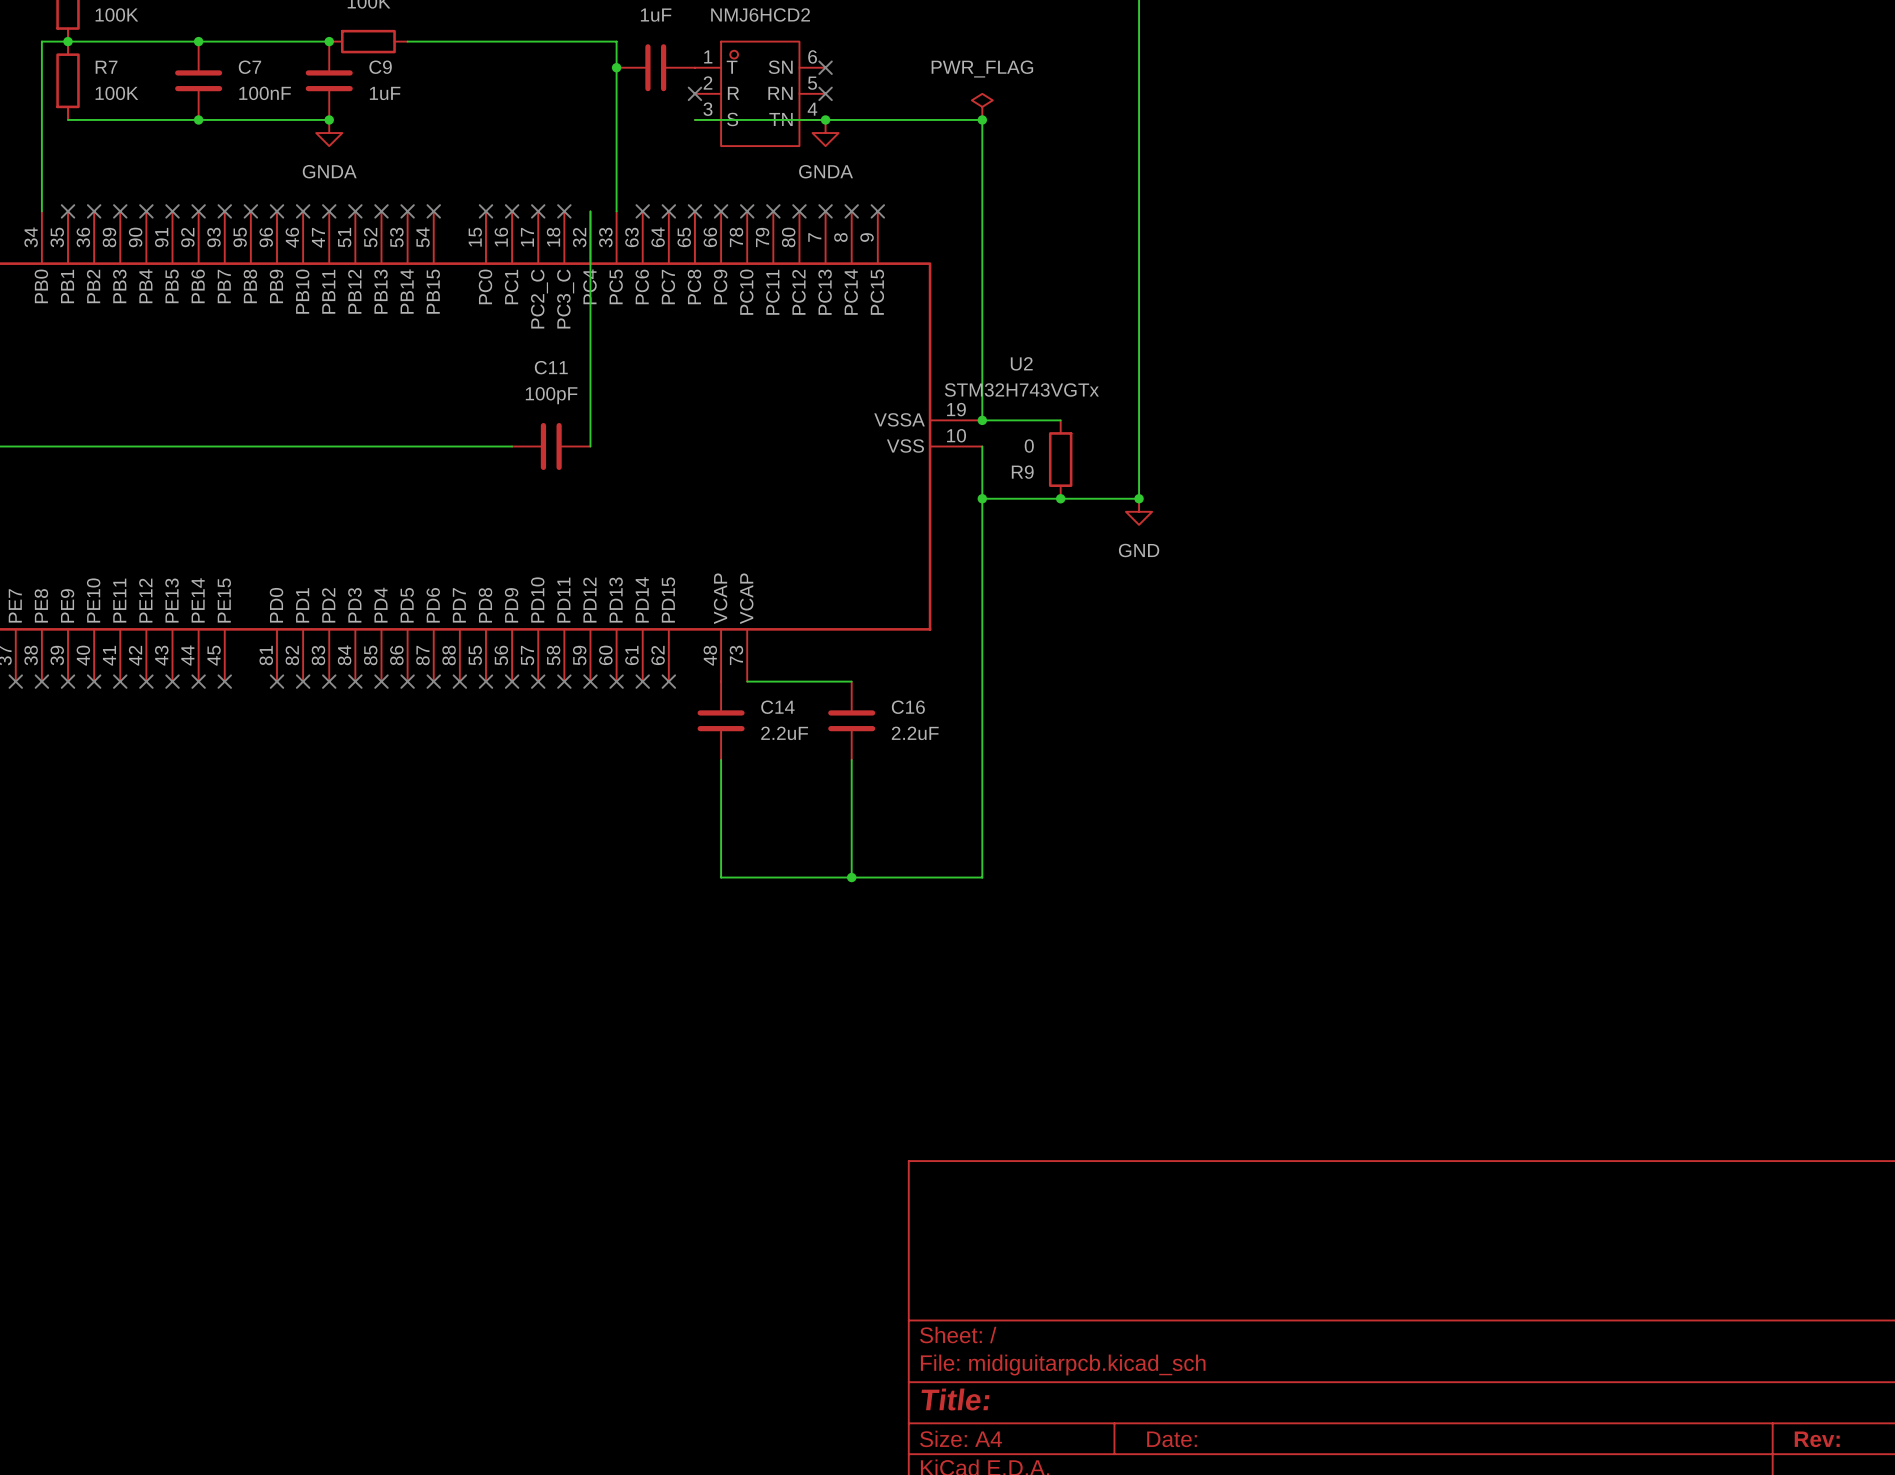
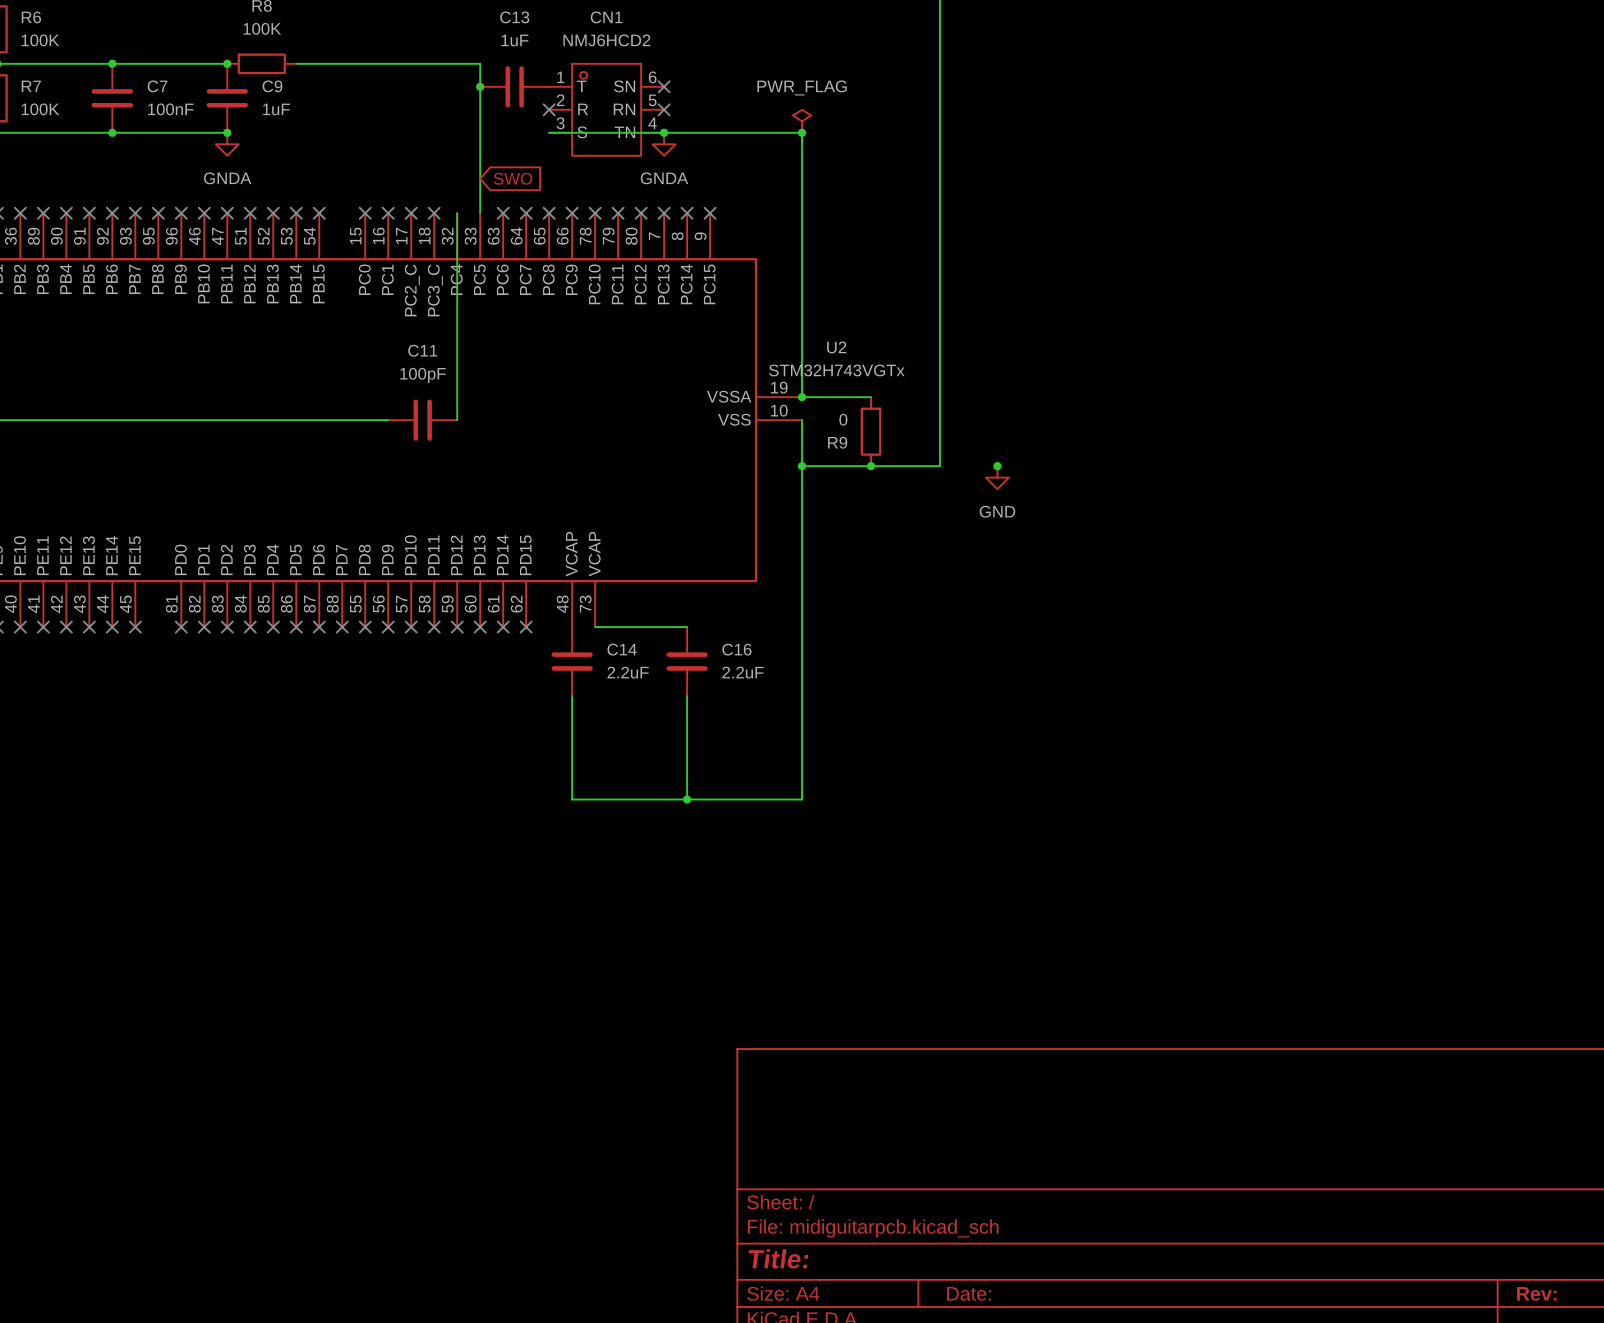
global label: none -> SWO (513, 178)
junction: (1139, 498) -> none
junction: none -> (997, 466)
power symbol position: GND (1139, 511) -> GND (997, 477)

